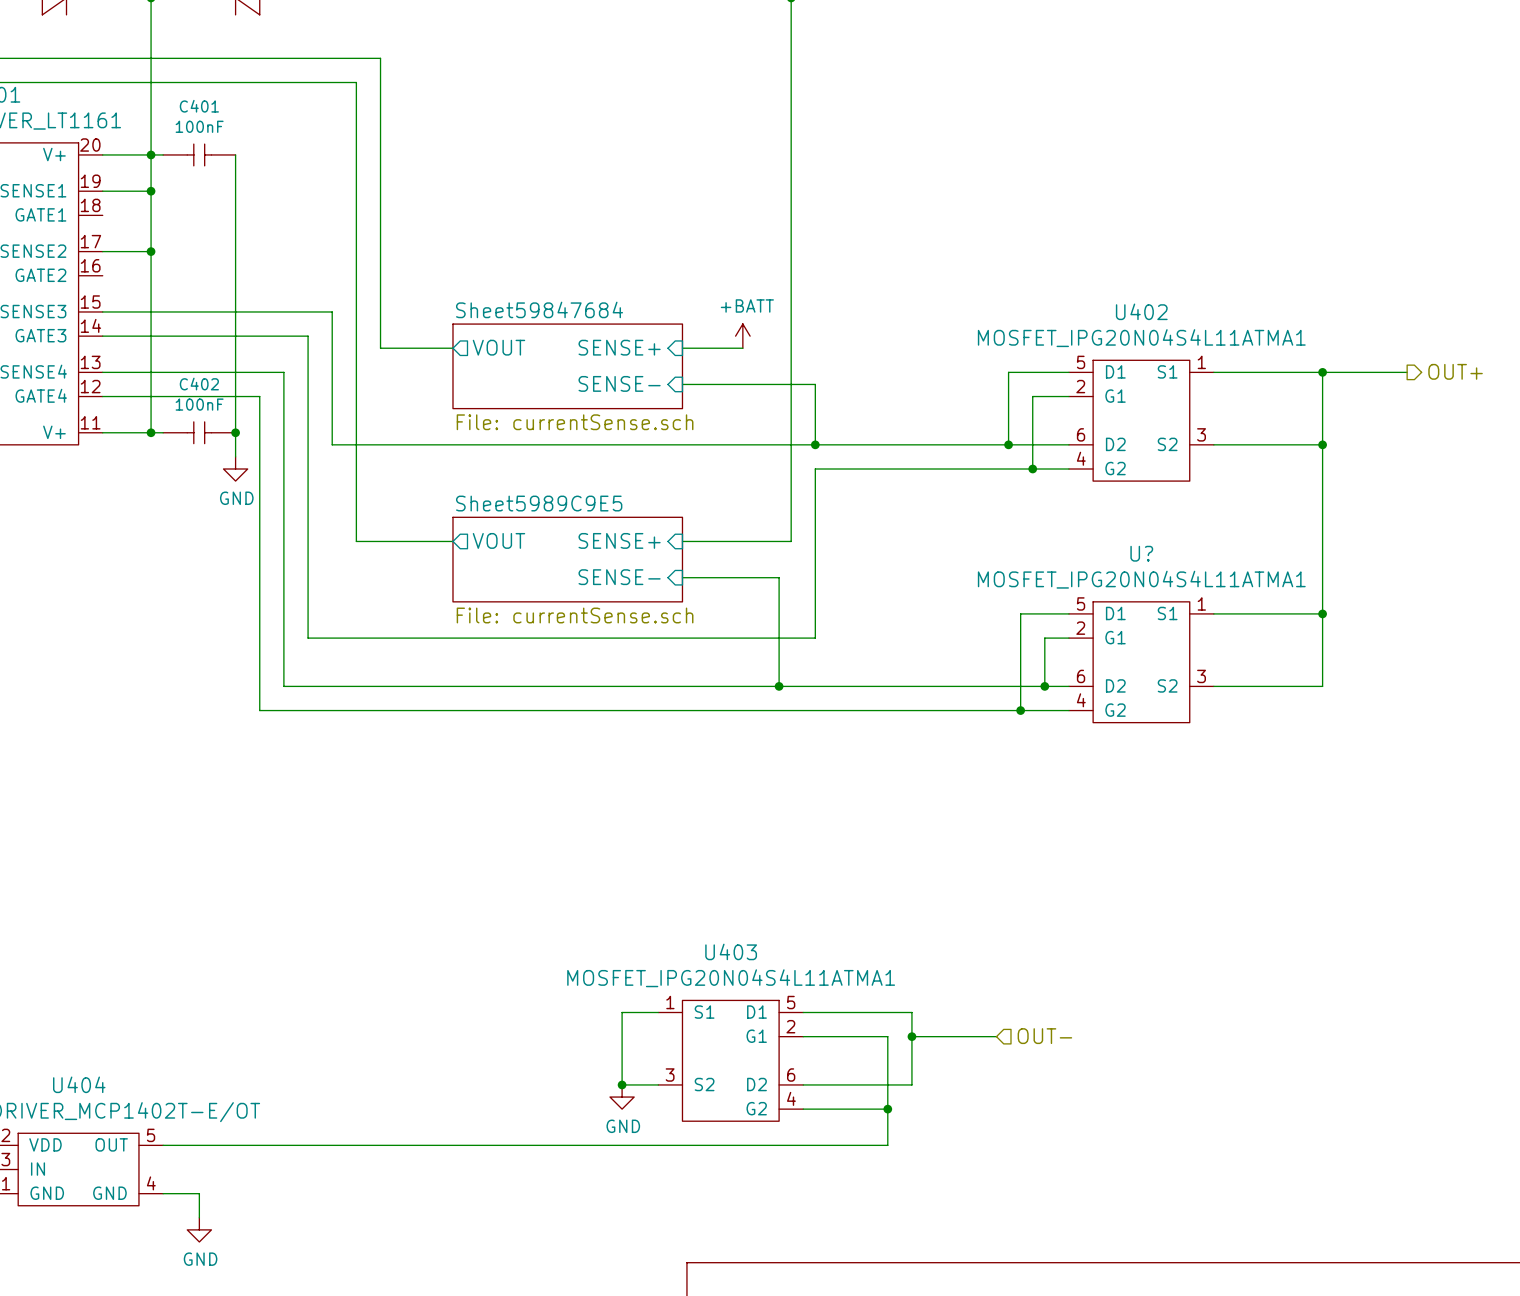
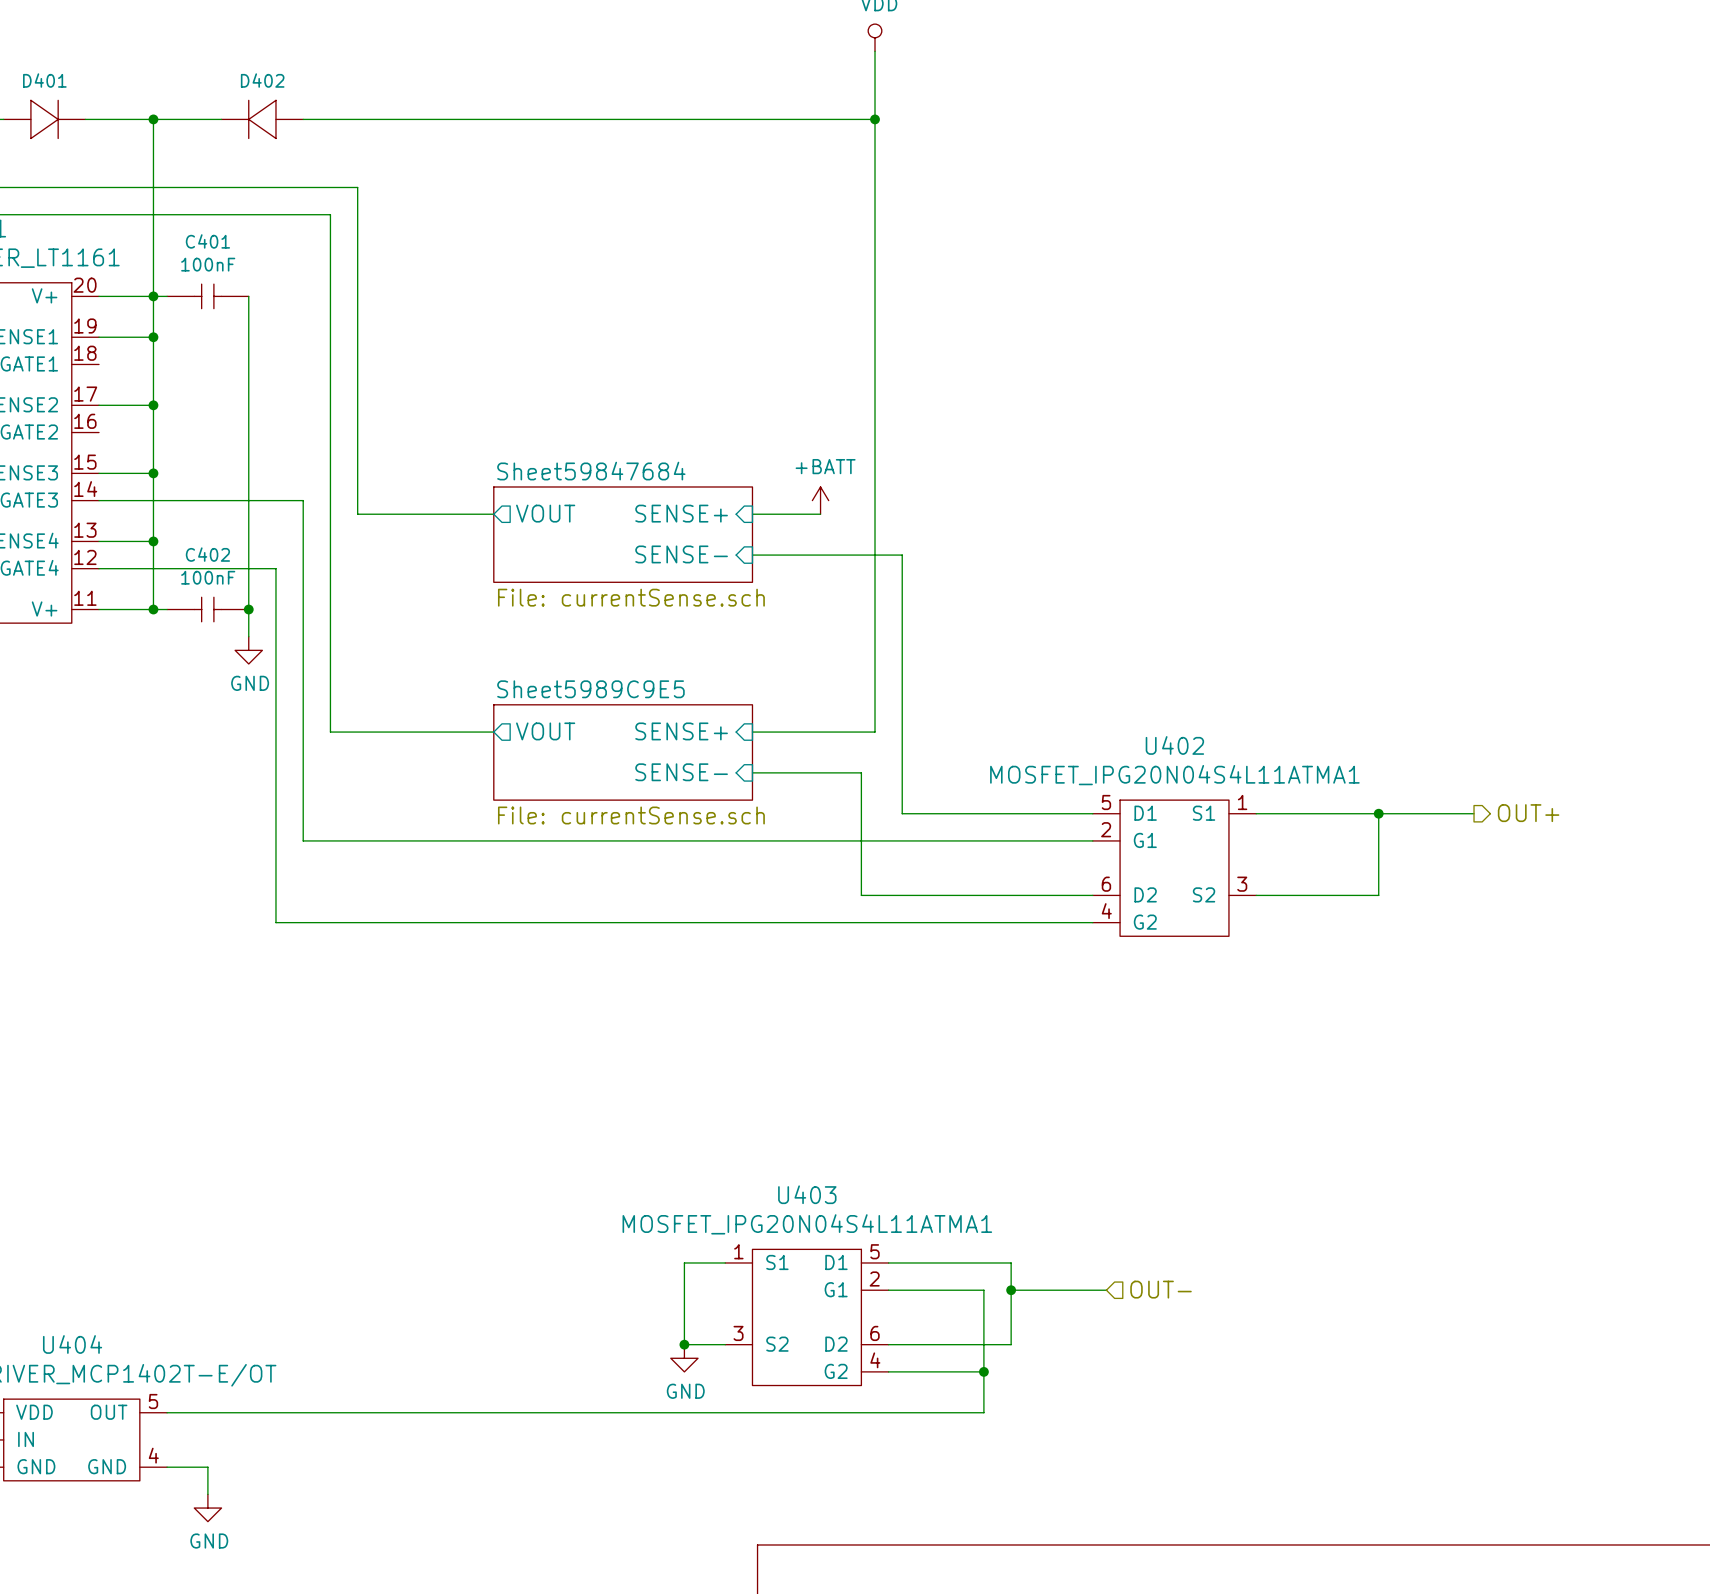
wire: (332, 58) (380, 58) (380, 348) -> (357, 187) (357, 473)
wire: (308, 82) (356, 82) (356, 541) -> (330, 214) (330, 500)
wire: (151, 311) (332, 311) -> none
junction: none -> (153, 473)
wire: (283, 336) (308, 336) -> (303, 500) (303, 541)
wire: (332, 348) (332, 444) (1068, 444) -> (357, 514) (412, 514)
hierarchical label: OUT+ (1455, 371) -> none
wire: (151, 372) (283, 372) -> none
junction: none -> (153, 541)
wire: (1068, 372) (1008, 372) (1008, 444) -> none
wire: (1213, 372) (1407, 372) -> none
wire: (1322, 372) (1322, 686) (1238, 686) -> (1378, 813) (1378, 895)
junction: (1322, 372) -> none
wire: (1068, 396) (1032, 396) (1032, 469) -> none
U402 position: (1141, 420) -> (1174, 868)
junction: (815, 444) -> none
junction: (1008, 444) -> none
wire: (1213, 444) (1322, 444) -> none
junction: (1322, 444) -> none
wire: (815, 469) (1068, 469) -> (902, 650) (902, 623)
junction: (1032, 469) -> none
wire: (308, 541) (308, 638) -> (303, 840) (330, 840)
wire: none -> (330, 732) (384, 732)
wire: (815, 613) (815, 638) -> (902, 813) (1092, 813)
wire: (1068, 613) (1020, 613) (1020, 710) -> none
junction: none -> (1378, 813)
junction: (1322, 613) -> none
hierarchical label: none -> OUT+ (1528, 813)
wire: (283, 638) (283, 686) (779, 686) -> none
wire: none -> (902, 840) (1092, 840)
wire: (1068, 638) (1044, 638) (1044, 686) -> none
U?: MOSFET_IPG20N04S4L11ATMA1 (1141, 662) -> none
junction: (779, 686) -> none
wire: (984, 686) (1068, 686) -> (1256, 895) (1351, 895)
junction: (1044, 686) -> none
wire: (984, 710) (1068, 710) -> (1256, 813) (1351, 813)
junction: (1020, 710) -> none

